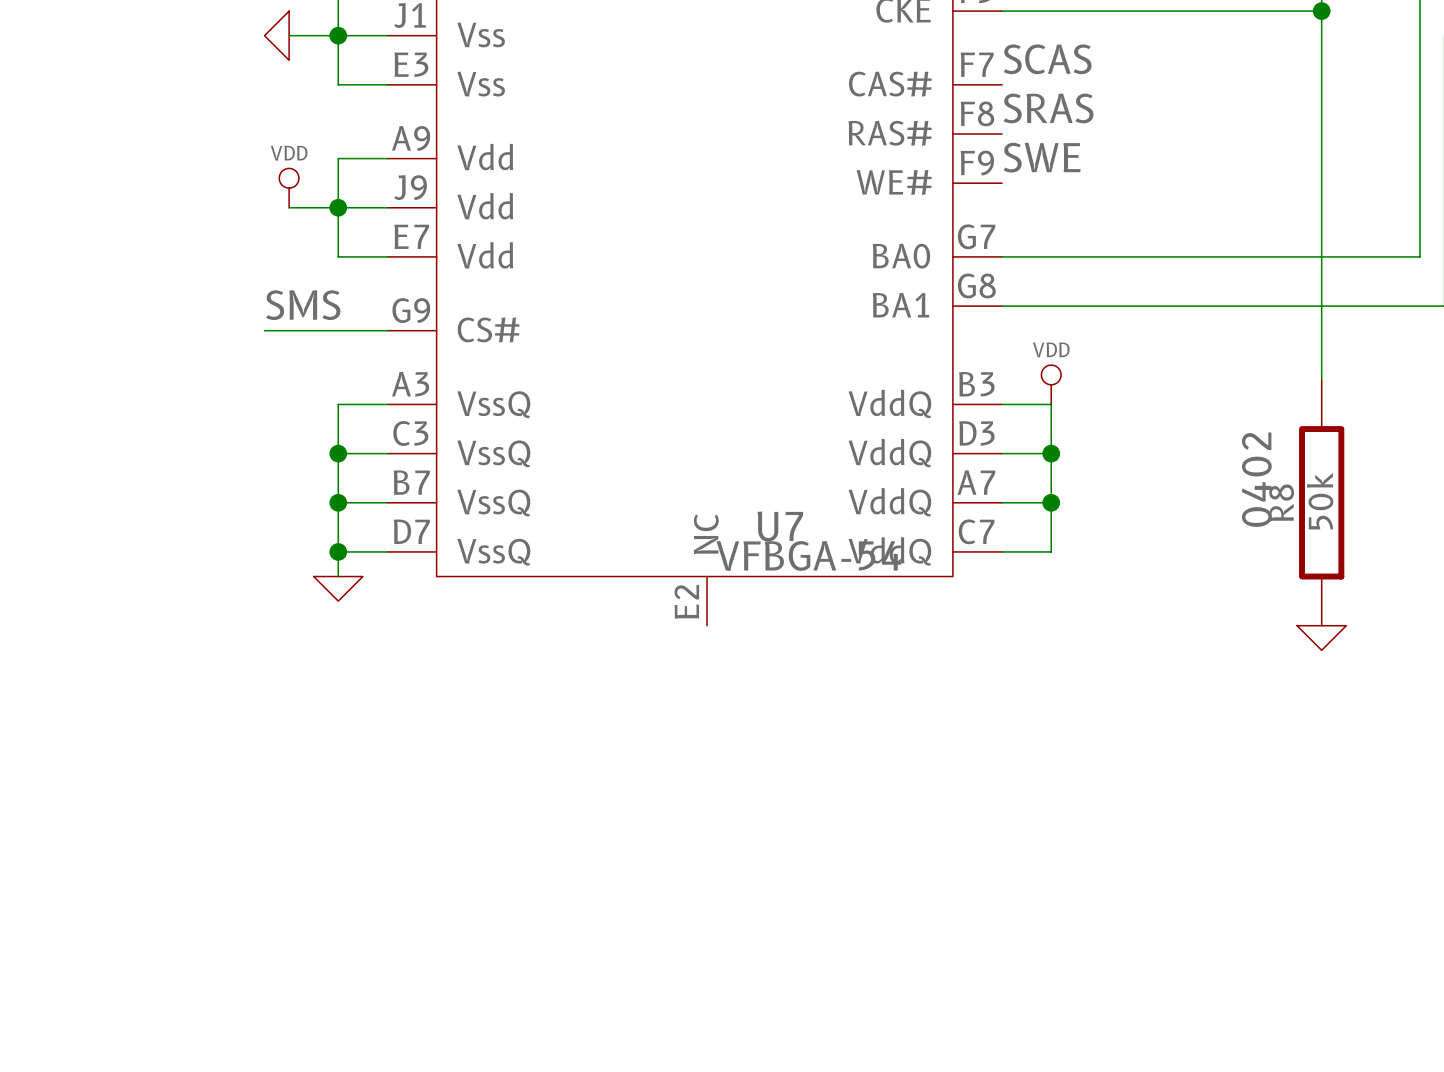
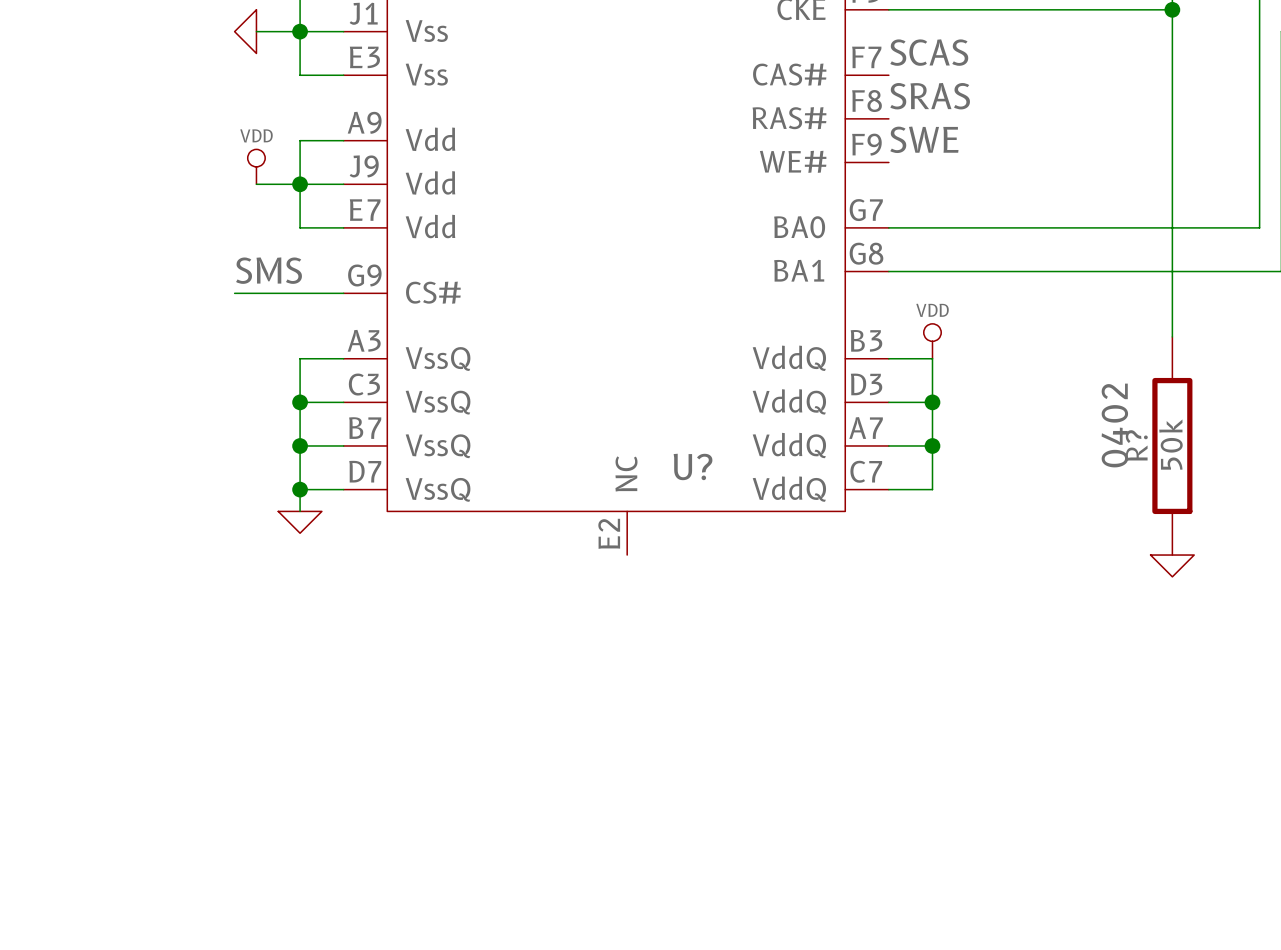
R8 name: R8 (1281, 502) -> R? (1136, 445)
U7 name: U7 (780, 526) -> U? (693, 466)
U7 text: VFBGA-54 (809, 555) -> none

